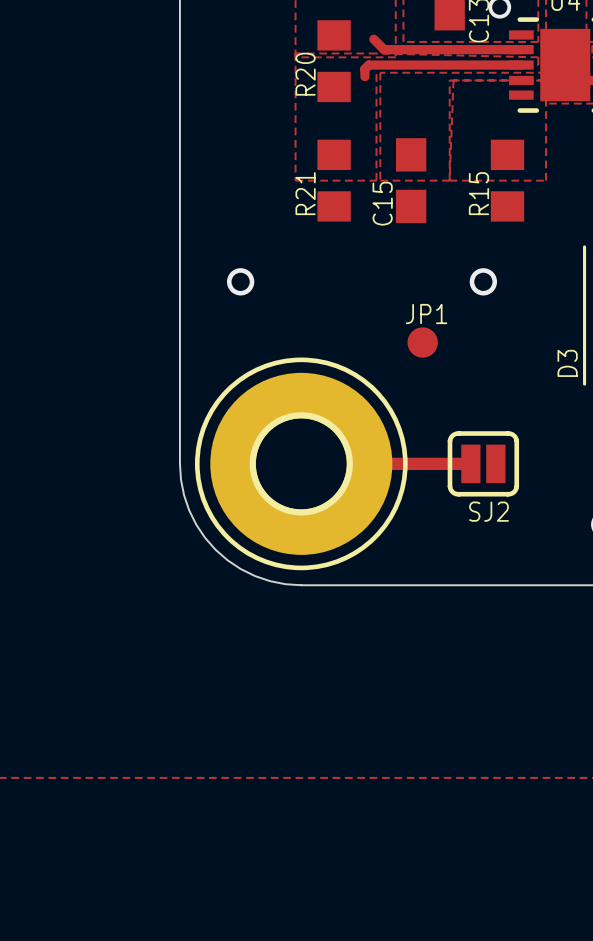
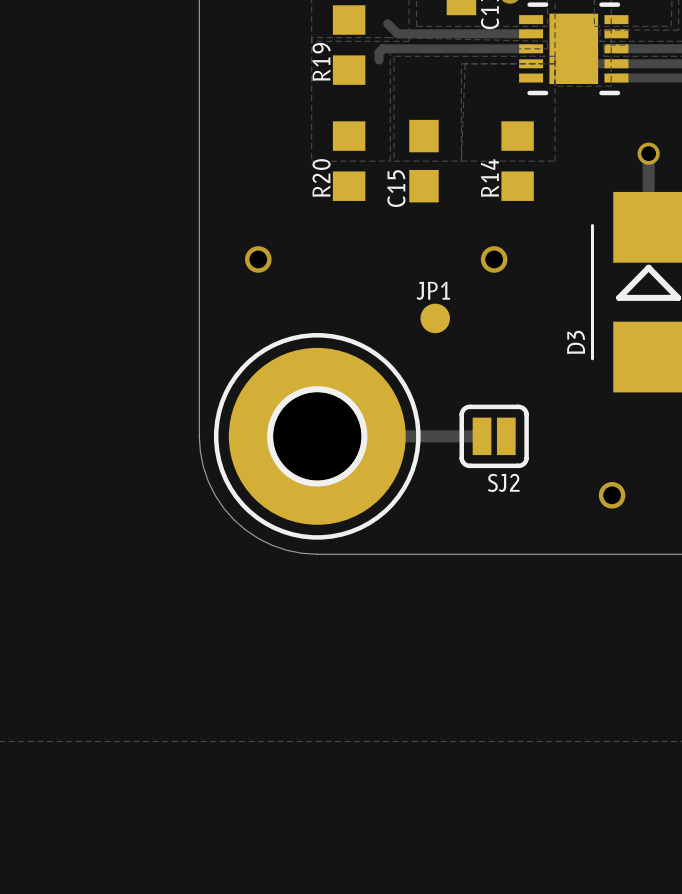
R20 name: R20 (305, 74) -> R19 (321, 61)
R21 name: R21 (305, 193) -> R20 (321, 178)
R15 name: R15 (478, 193) -> R14 (489, 178)

